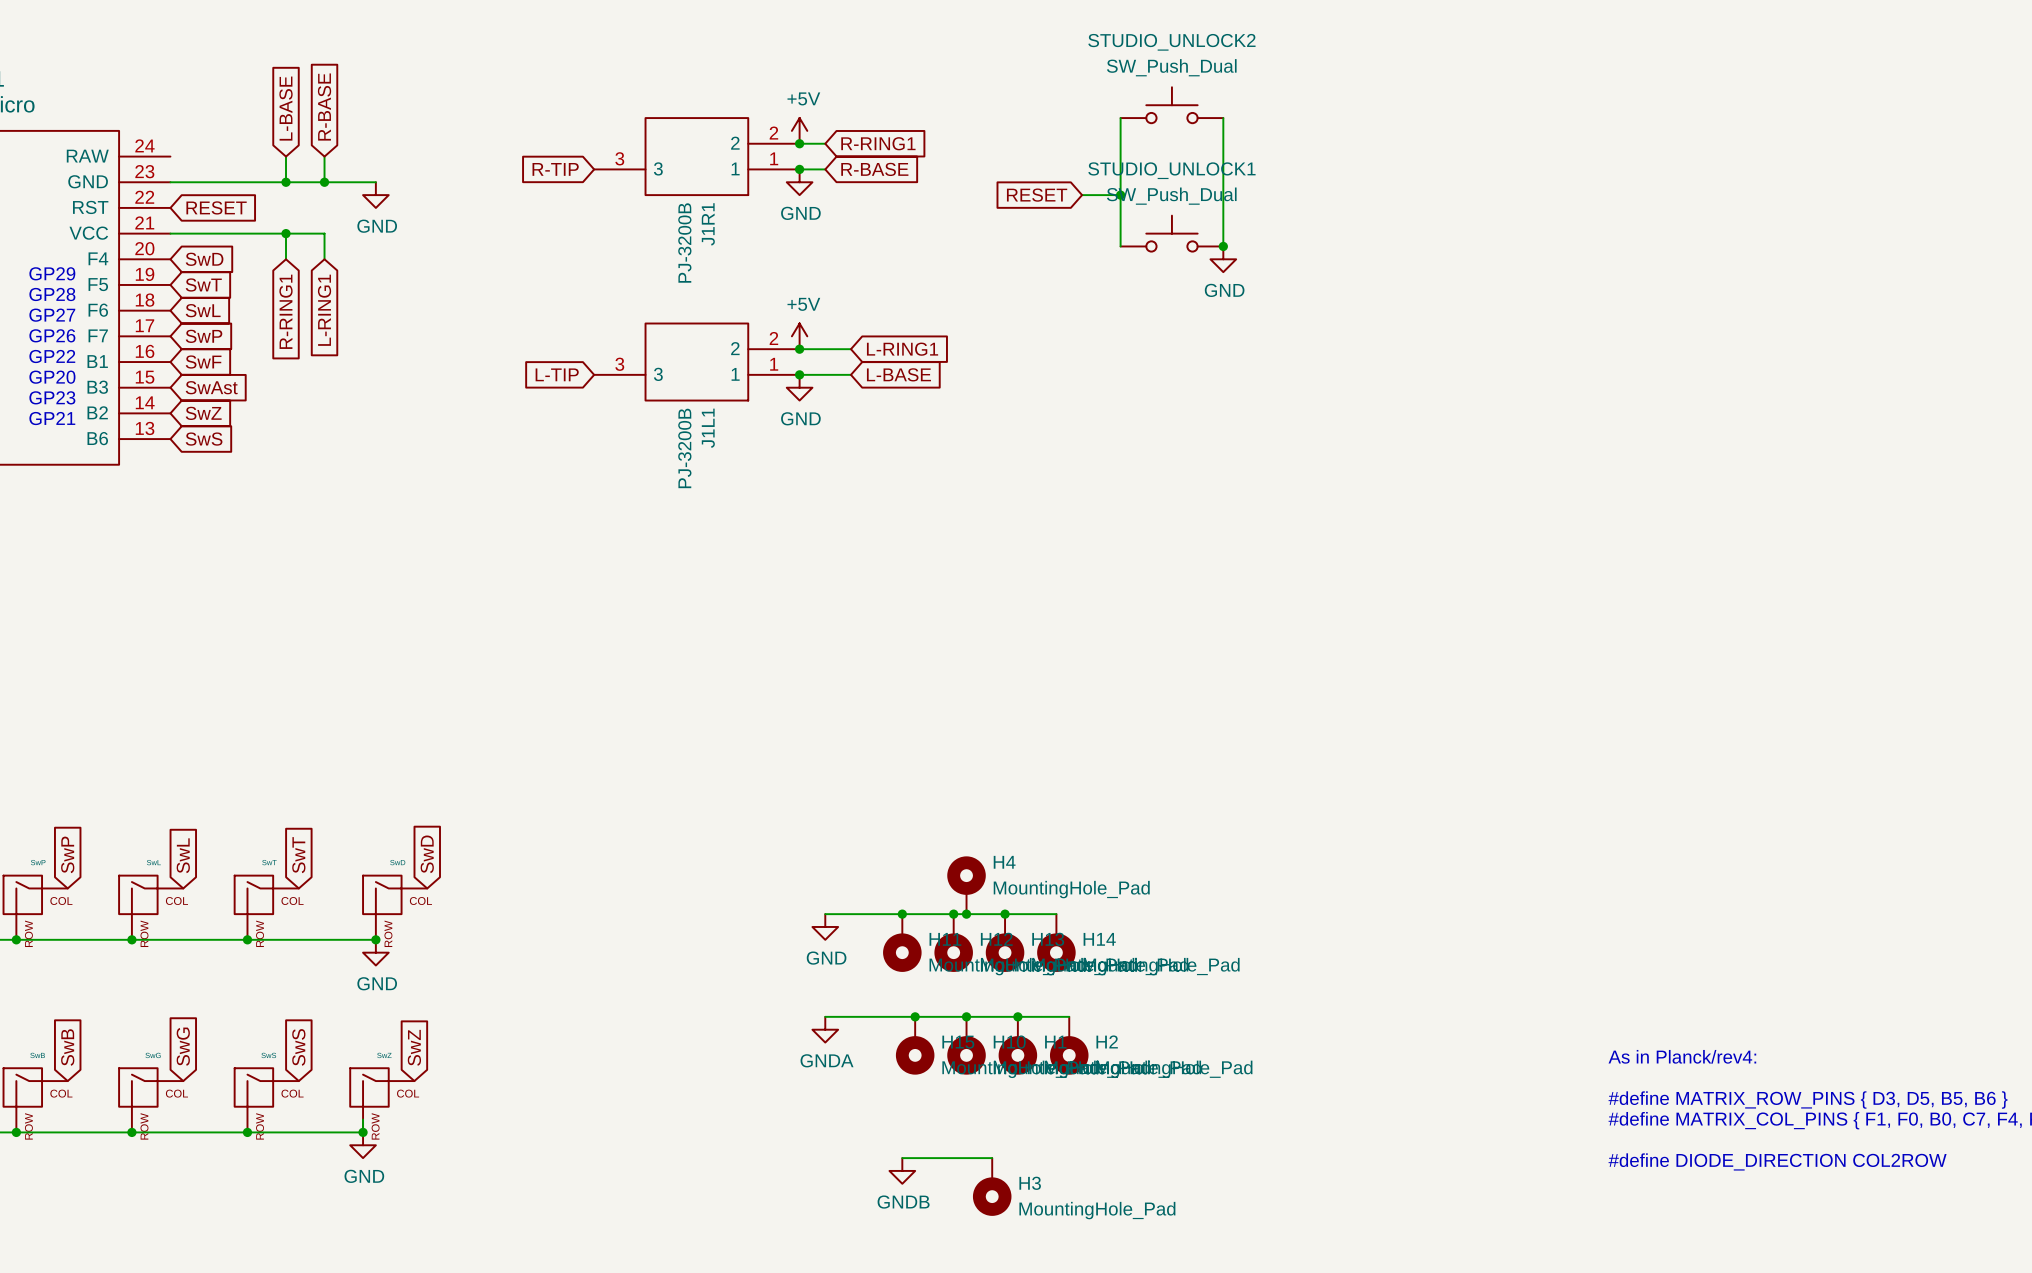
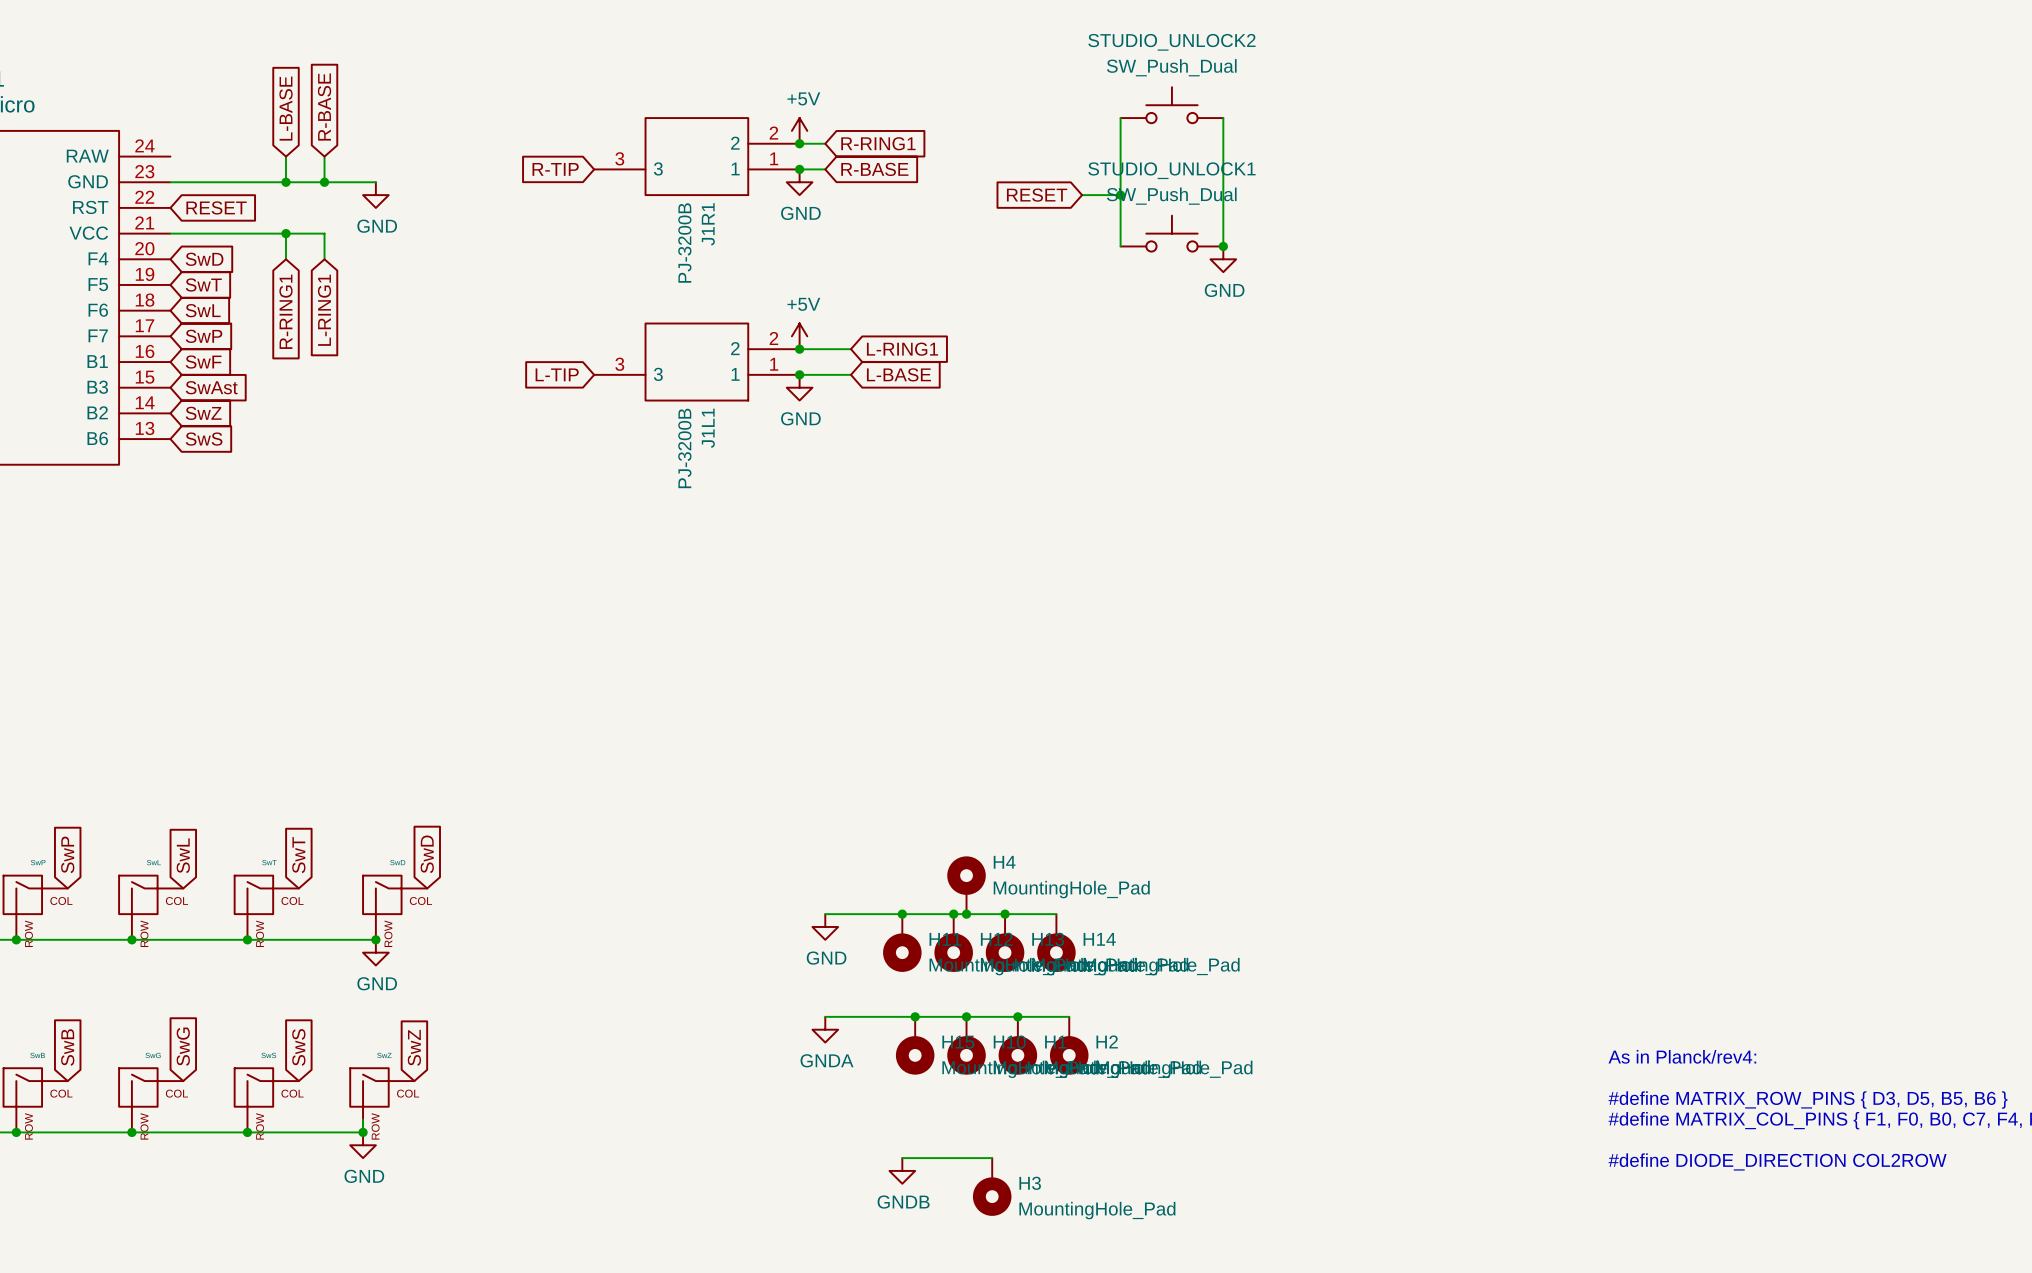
text: GP29 (52, 273) -> none
text: GP28 (52, 294) -> none
text: GP27 (52, 315) -> none
text: GP26 (52, 335) -> none
text: GP22 (52, 356) -> none
text: GP20 (52, 377) -> none
text: GP23 (52, 397) -> none
text: GP21 (52, 418) -> none

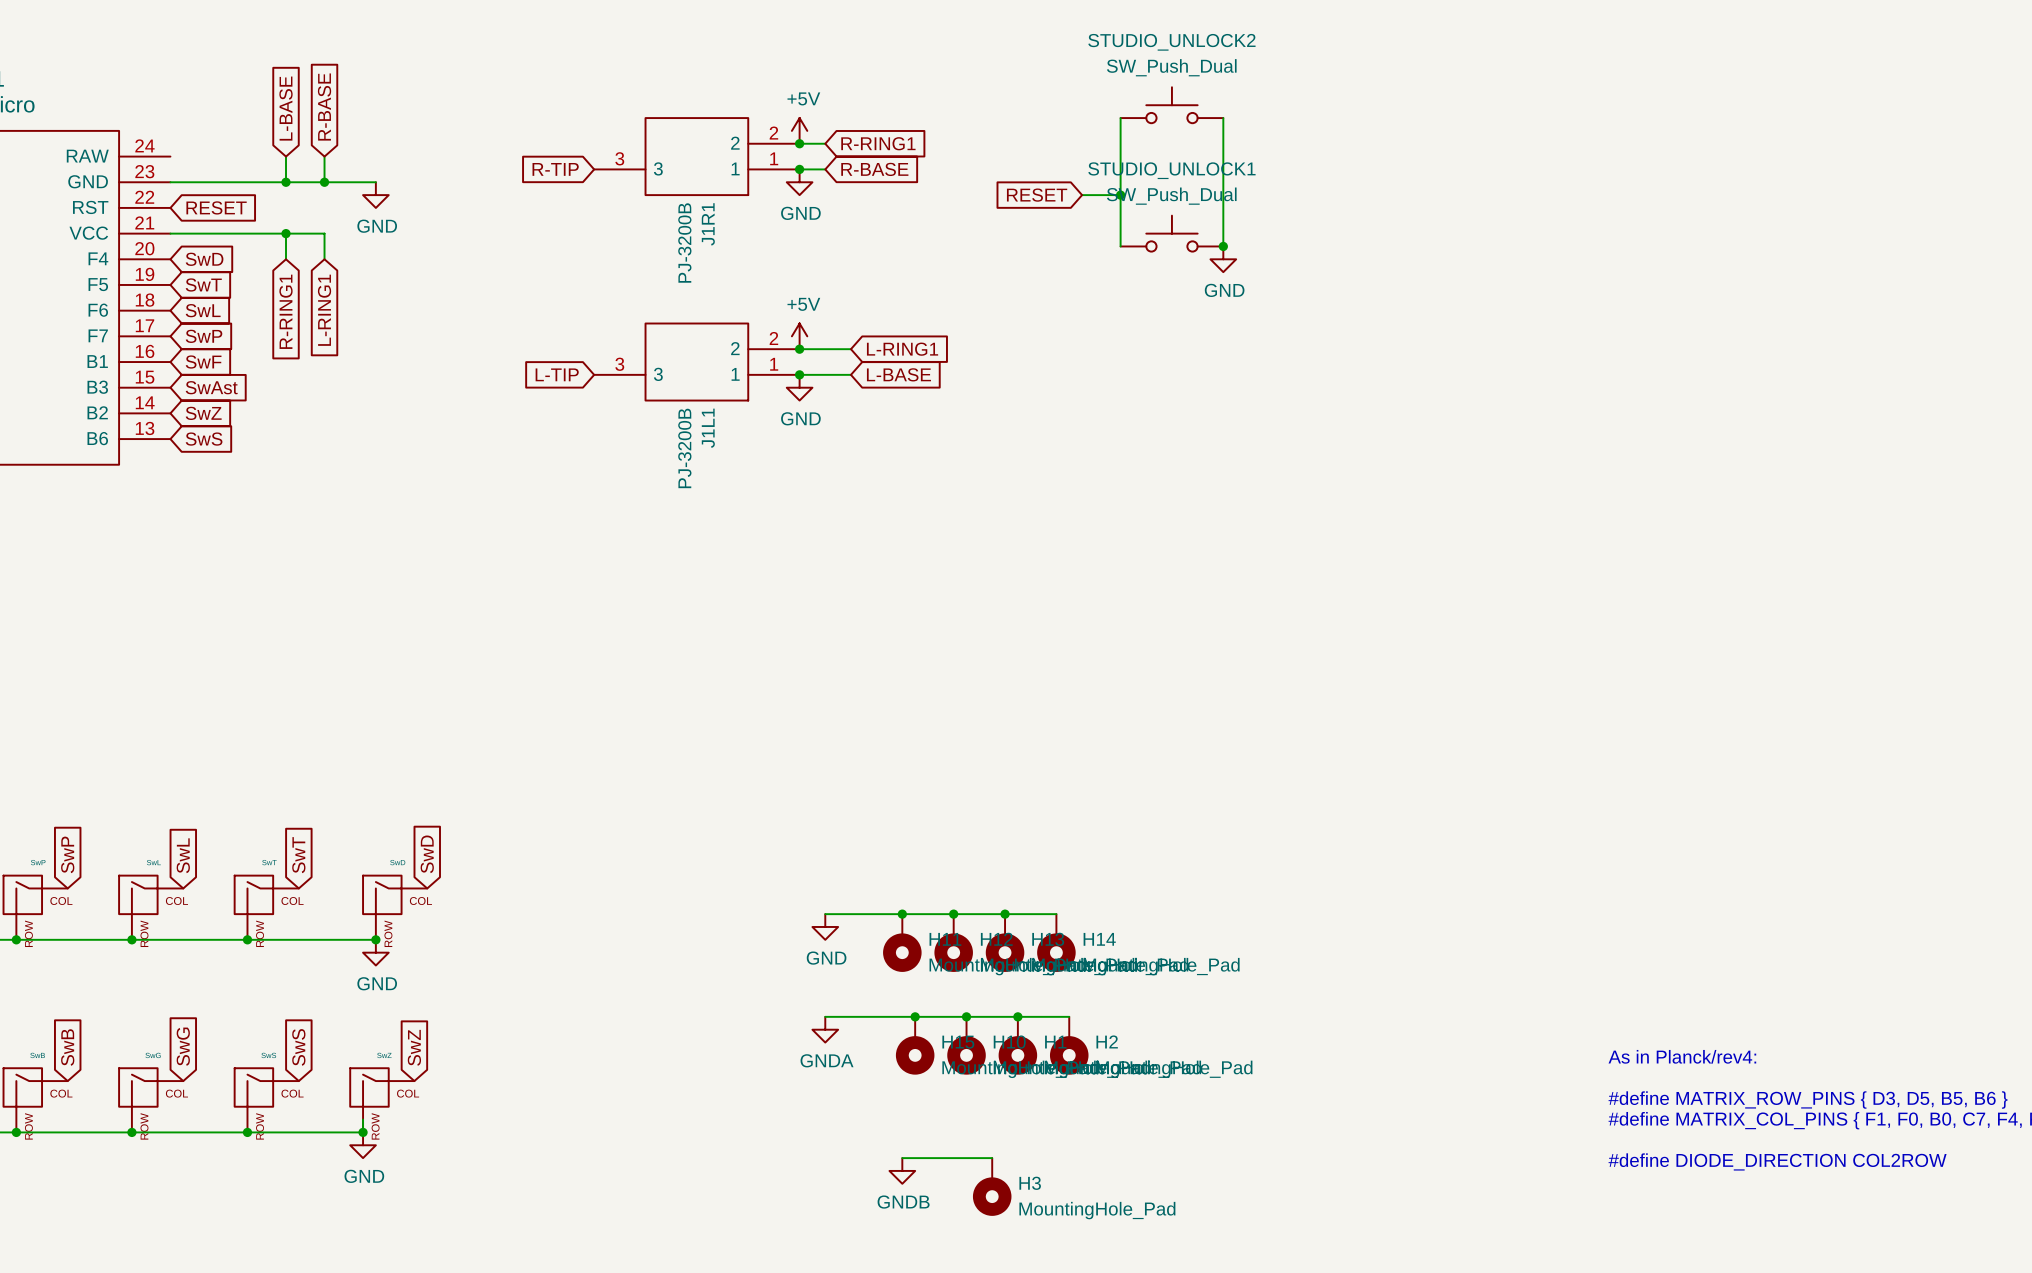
H4: MountingHole_Pad (966, 885) -> none
junction: (966, 914) -> none

